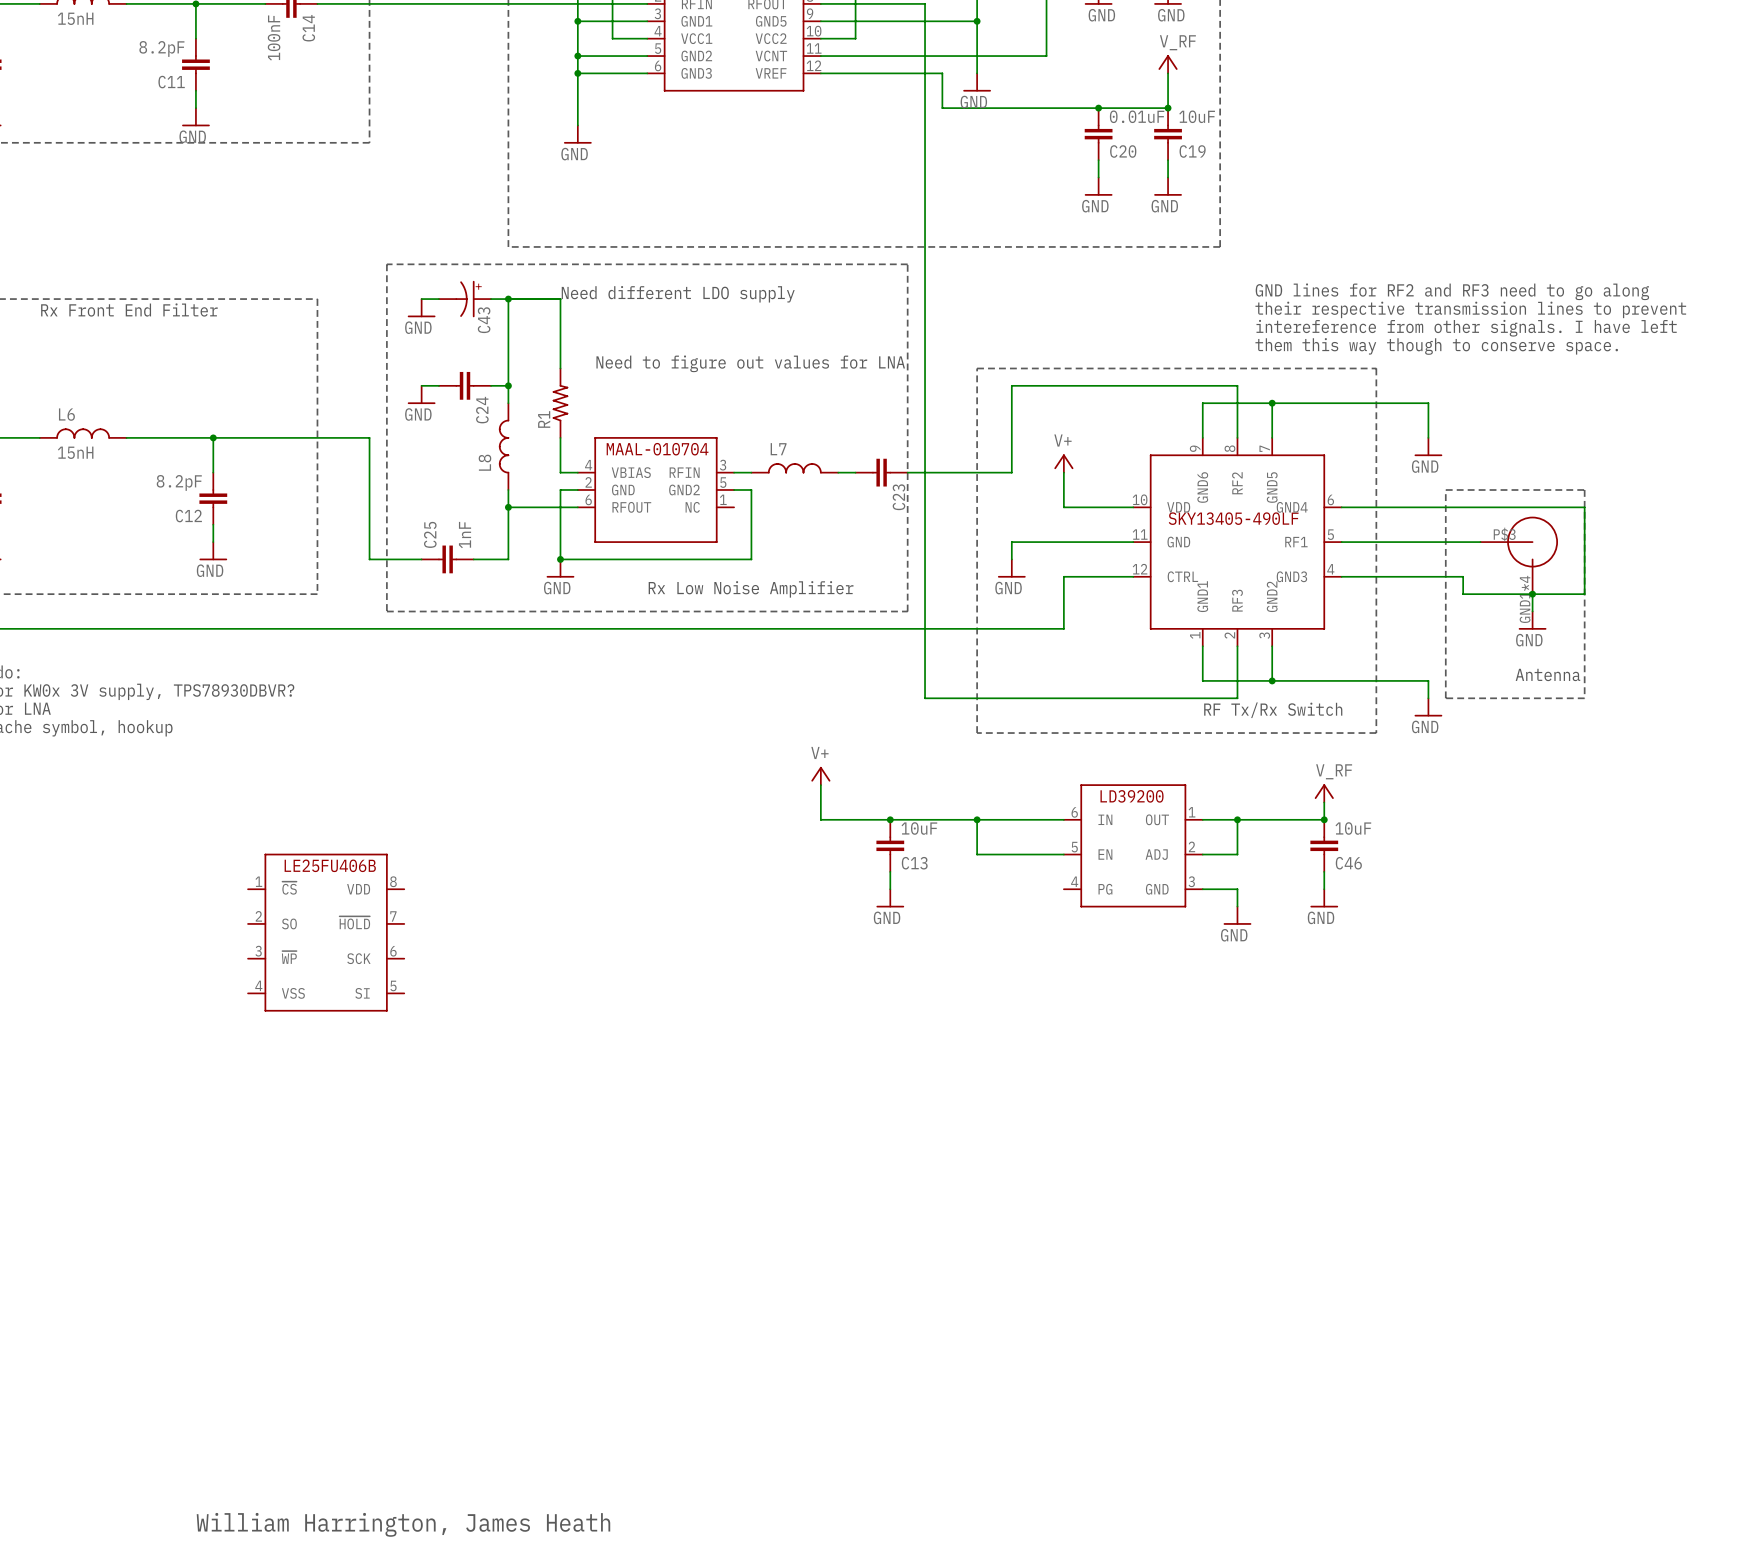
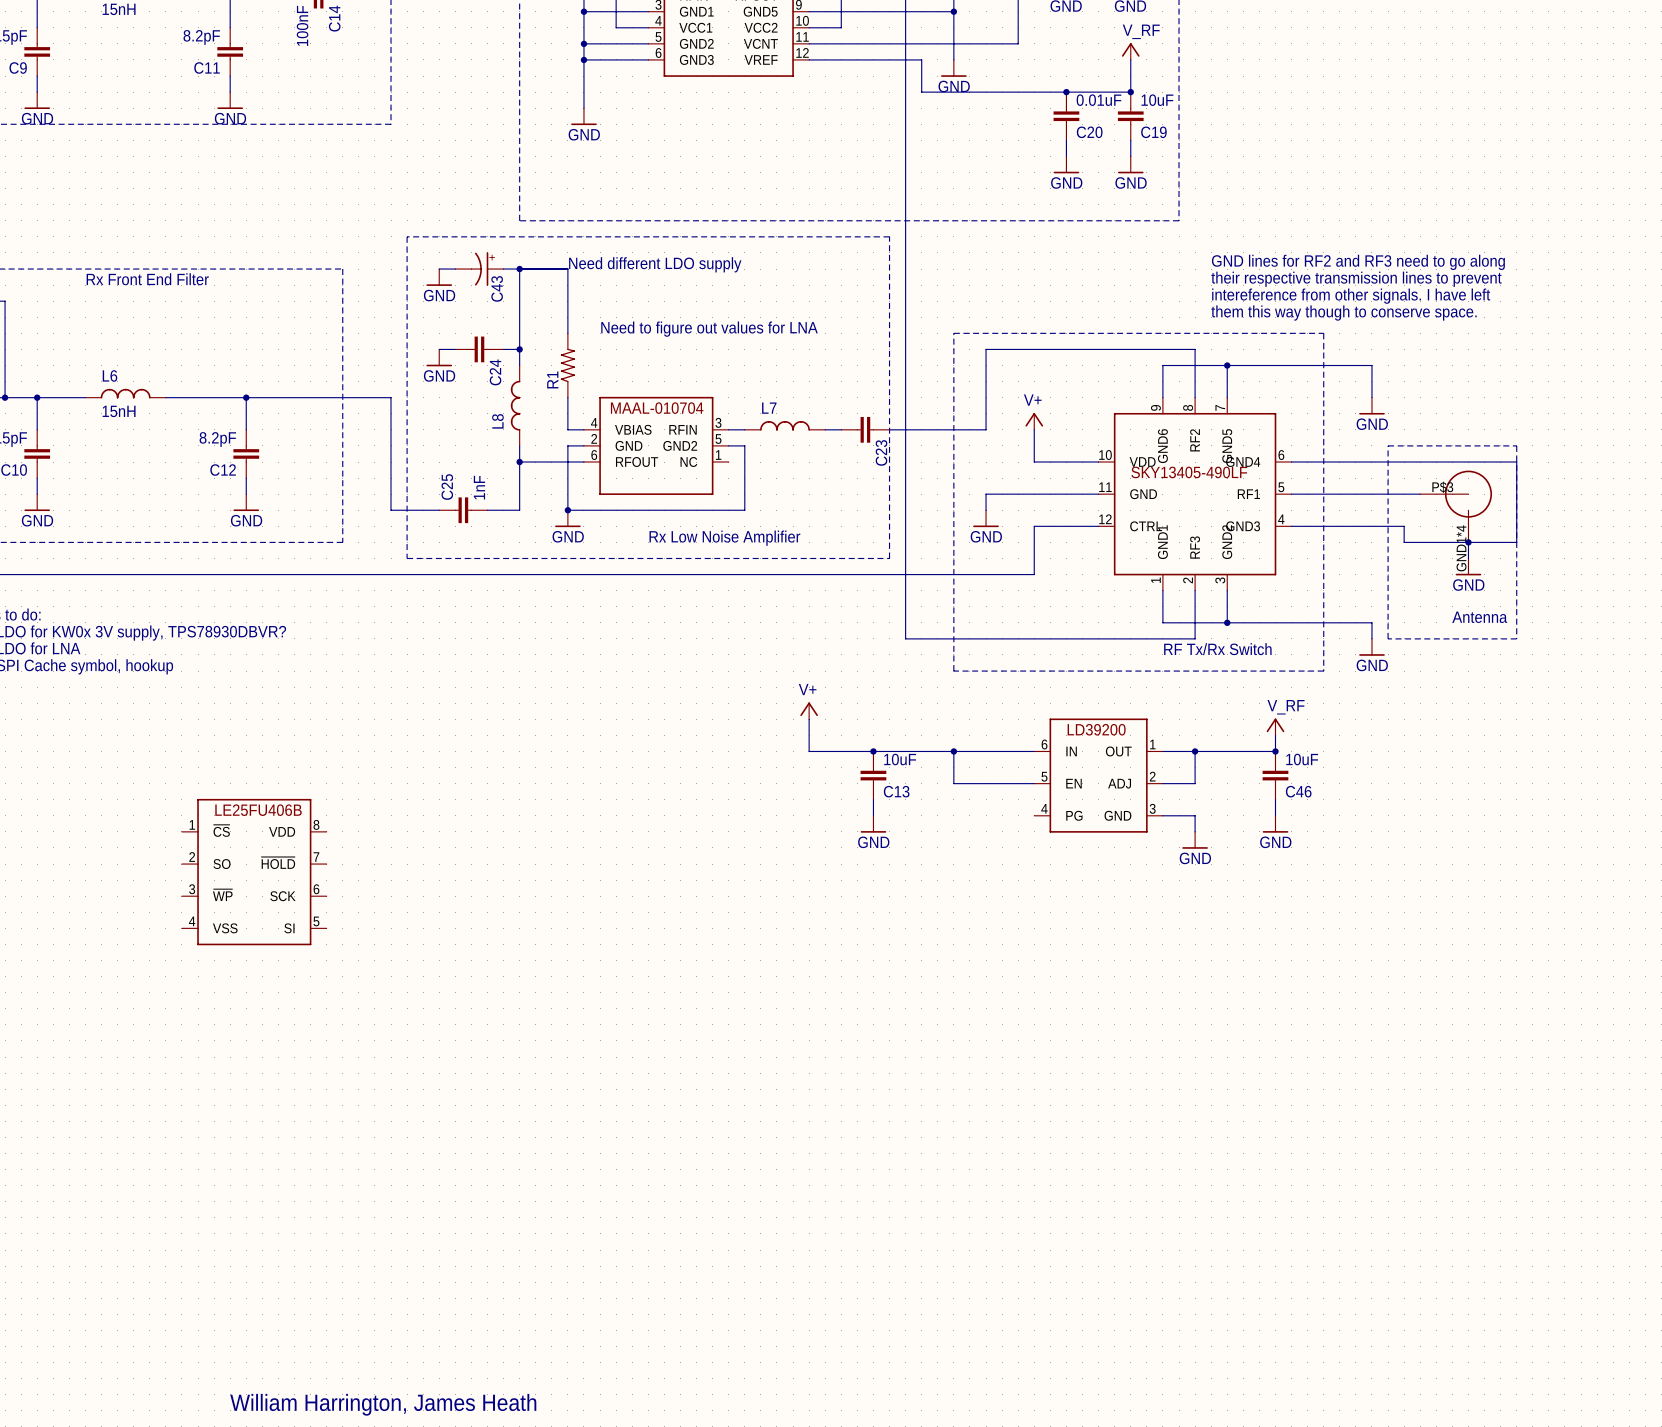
part position: (326, 932) -> (254, 872)

